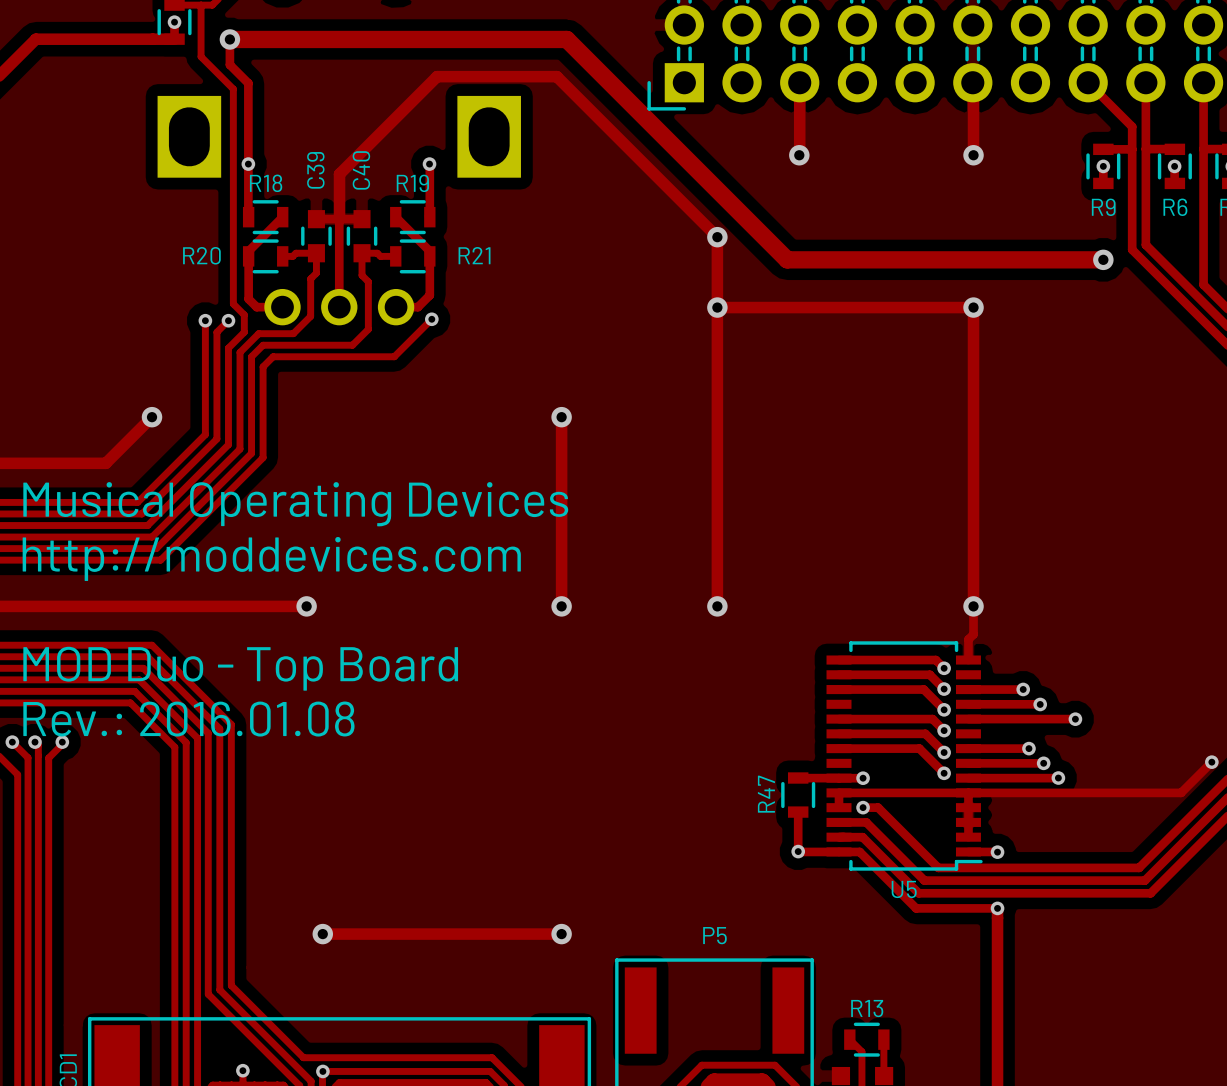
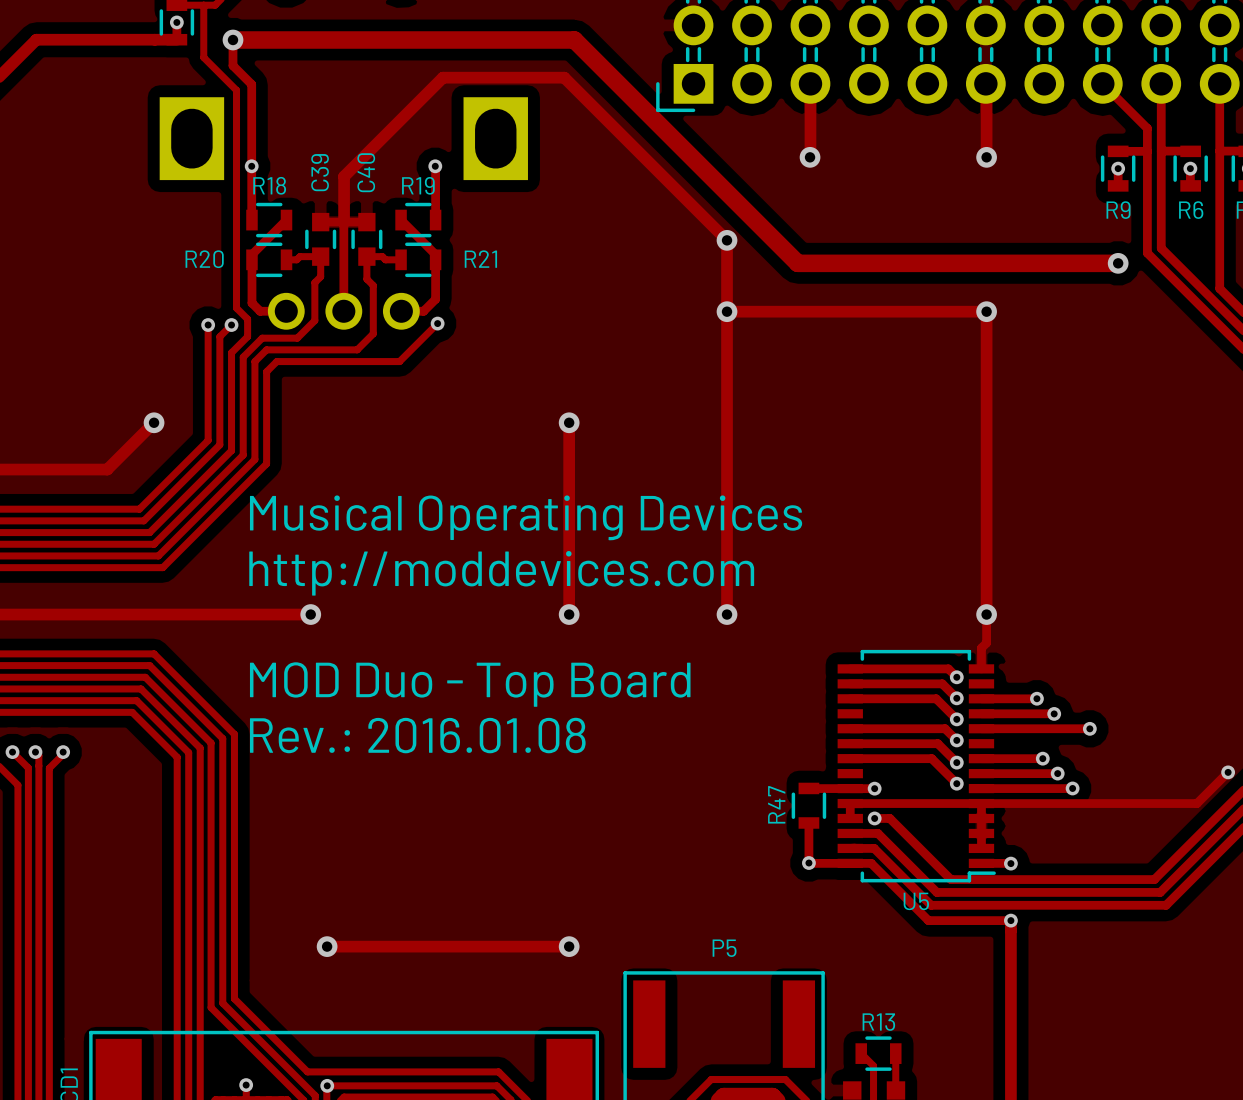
text position: Musical Operating Devices (295, 504) -> Musical Operating Devices (526, 517)
text position: http://moddevices.com (271, 558) -> http://moddevices.com (501, 573)
text position: MOD Duo - Top Board (240, 668) -> MOD Duo - Top Board (470, 684)
text position: Rev.: 2016.01.08 (188, 719) -> Rev.: 2016.01.08 (417, 735)

